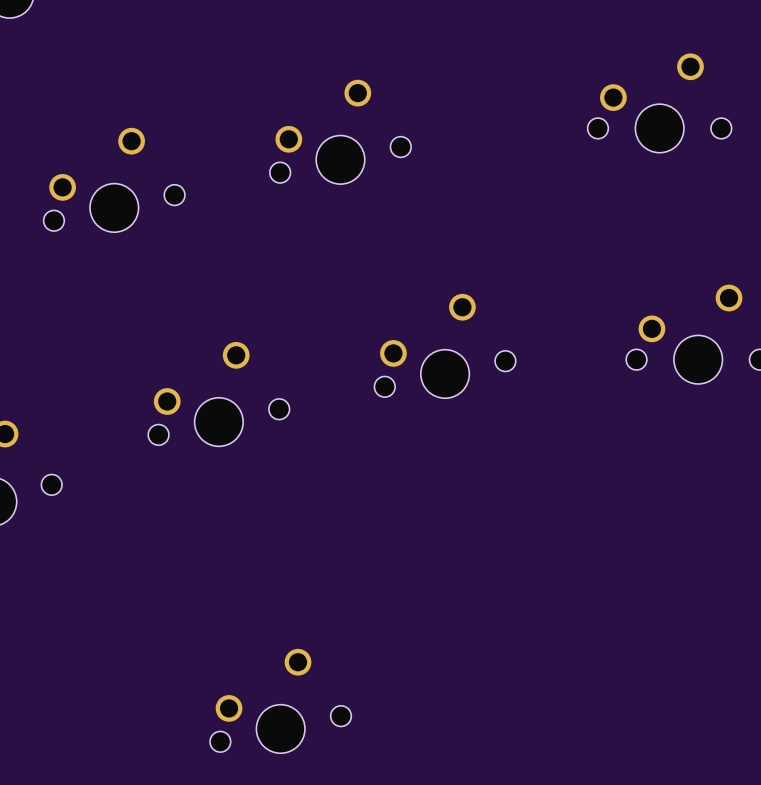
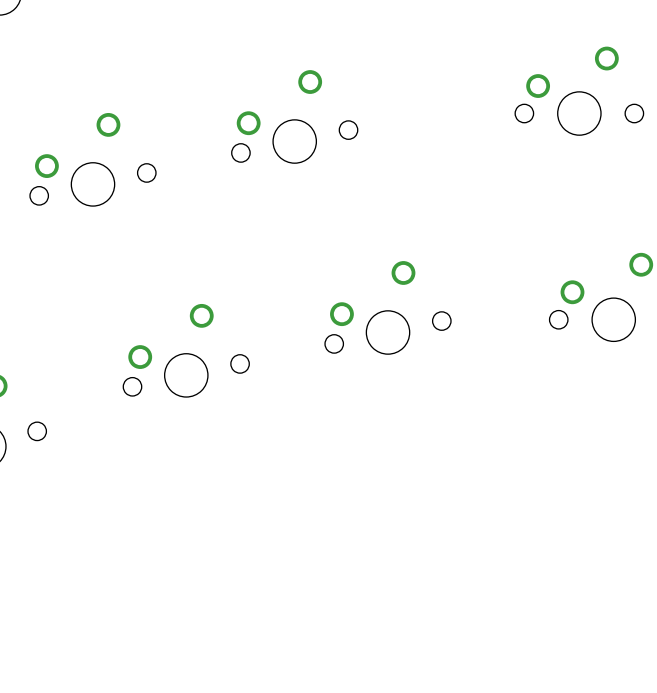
part: (280, 701) -> none

